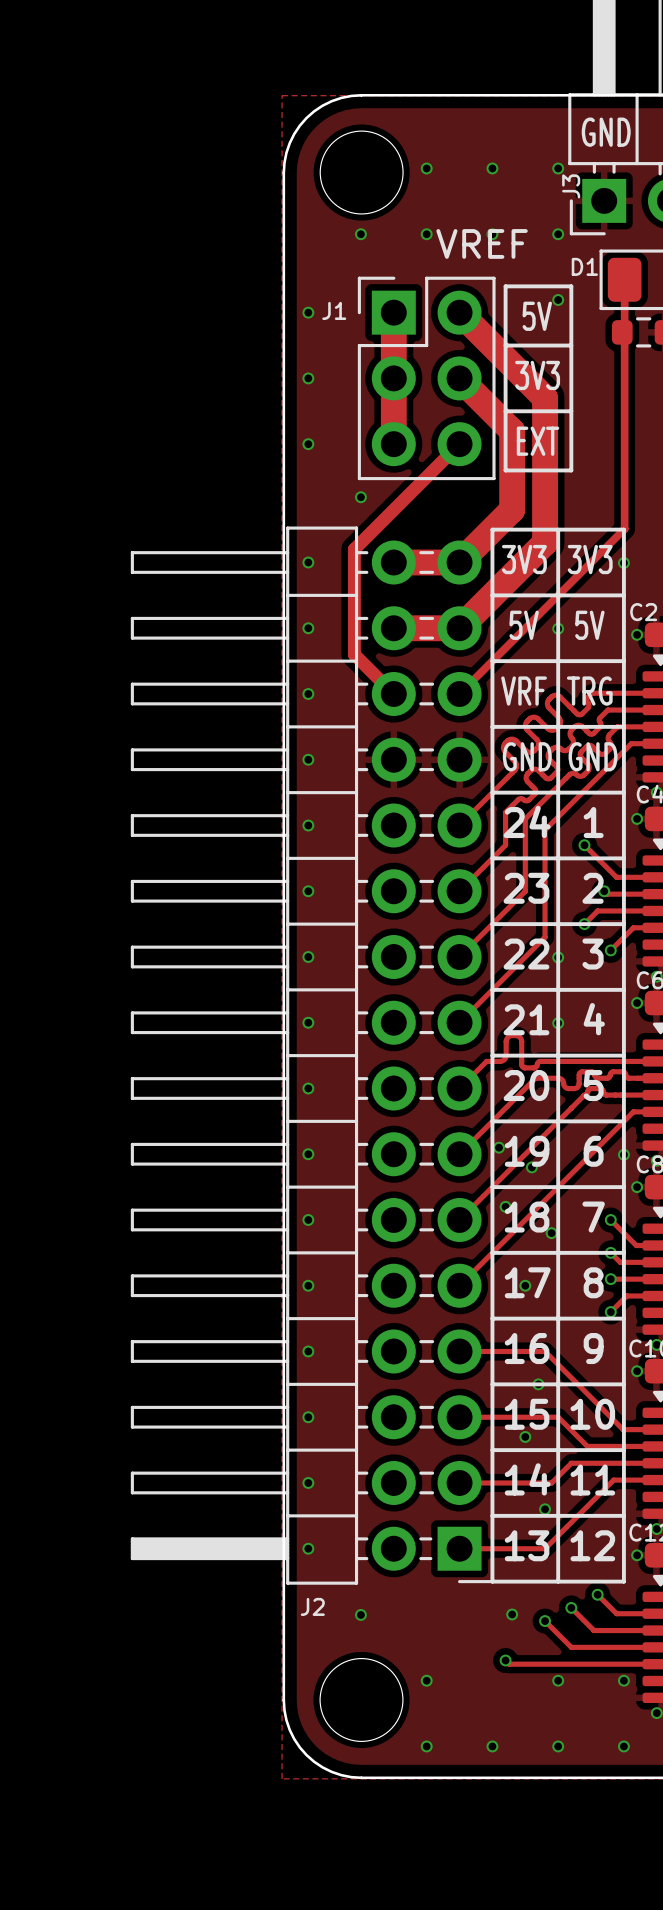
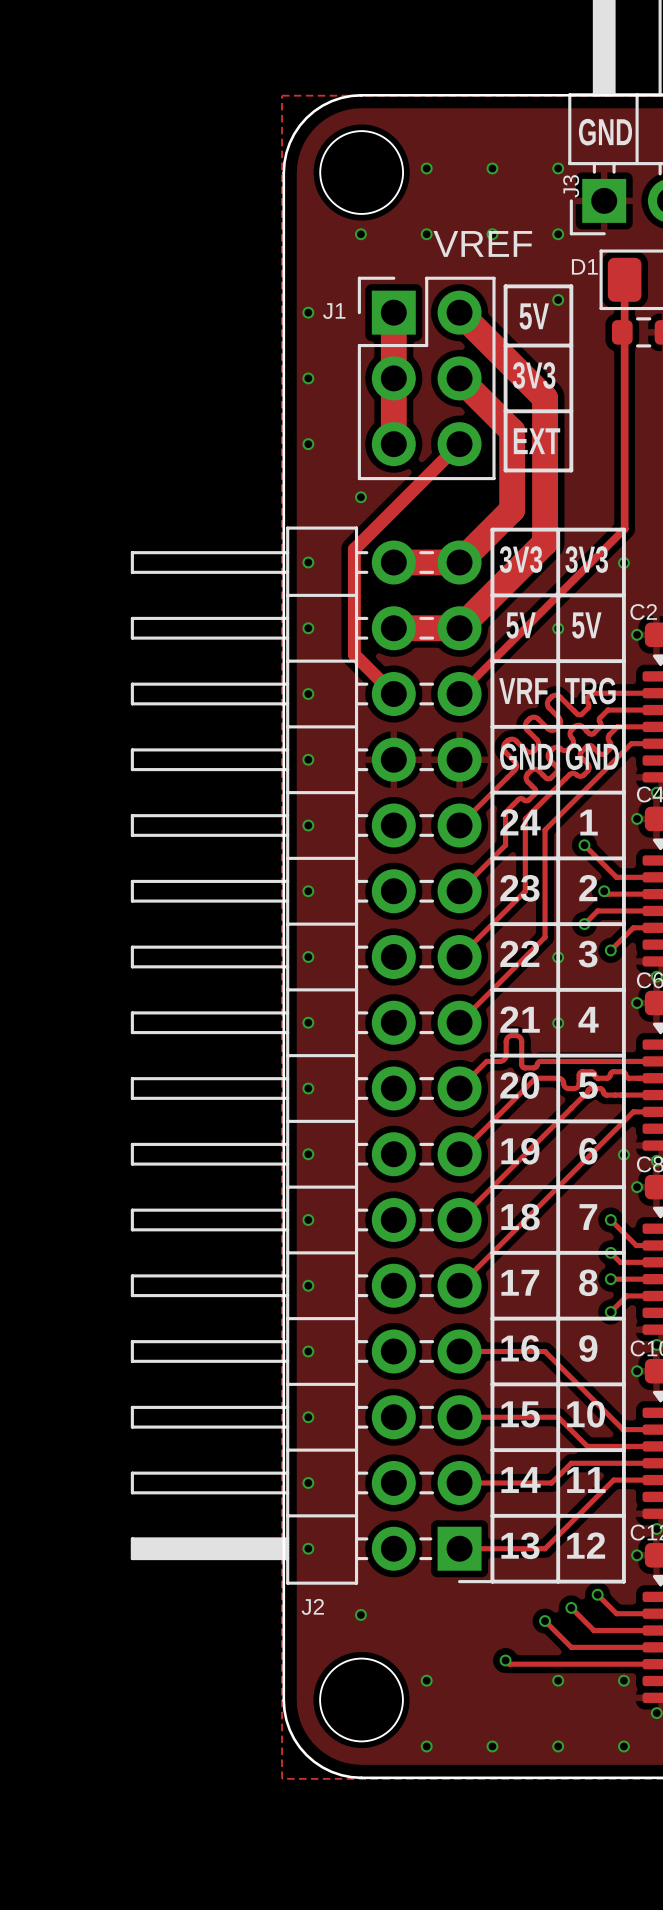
via: (499, 1147) -> none
via: (531, 1167) -> none
via: (505, 1206) -> none
via: (551, 1233) -> none
via: (525, 1285) -> none
via: (538, 1384) -> none
via: (525, 1436) -> none
via: (545, 1509) -> none
via: (512, 1614) -> none

